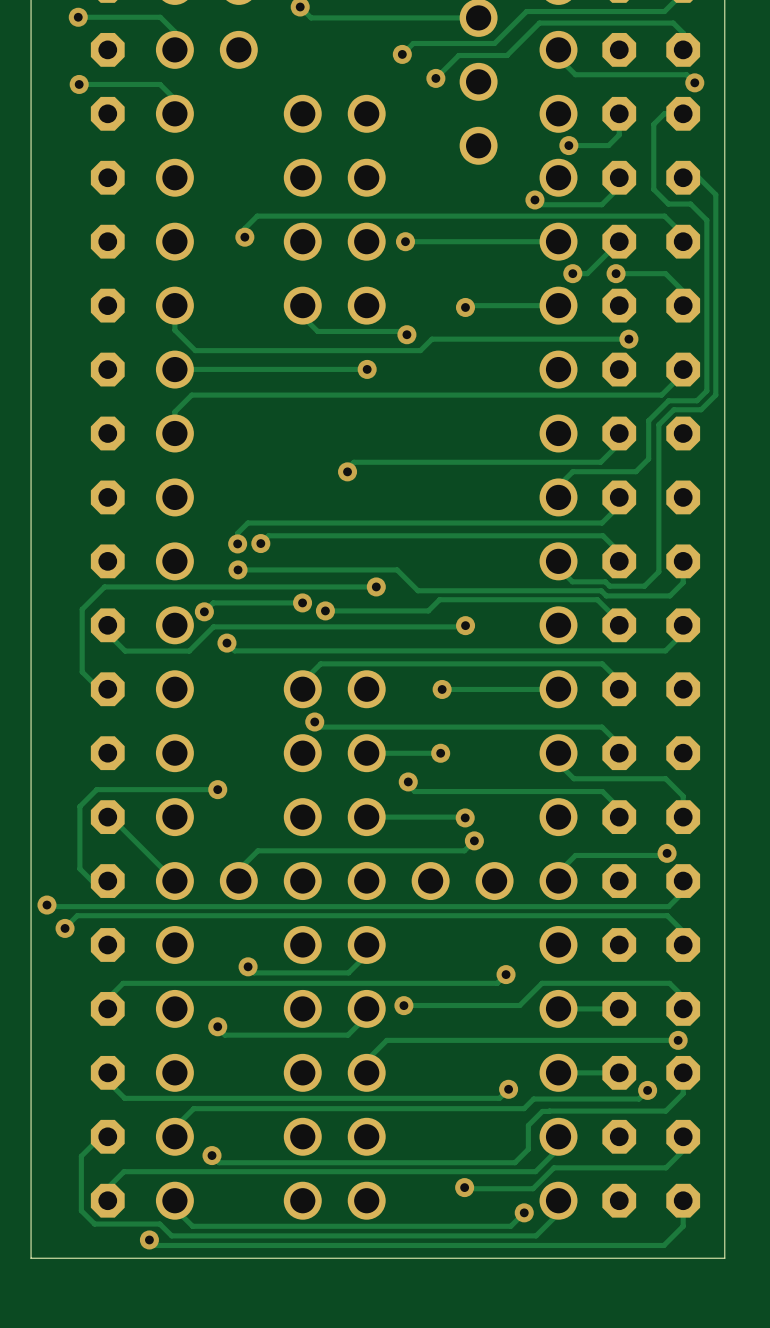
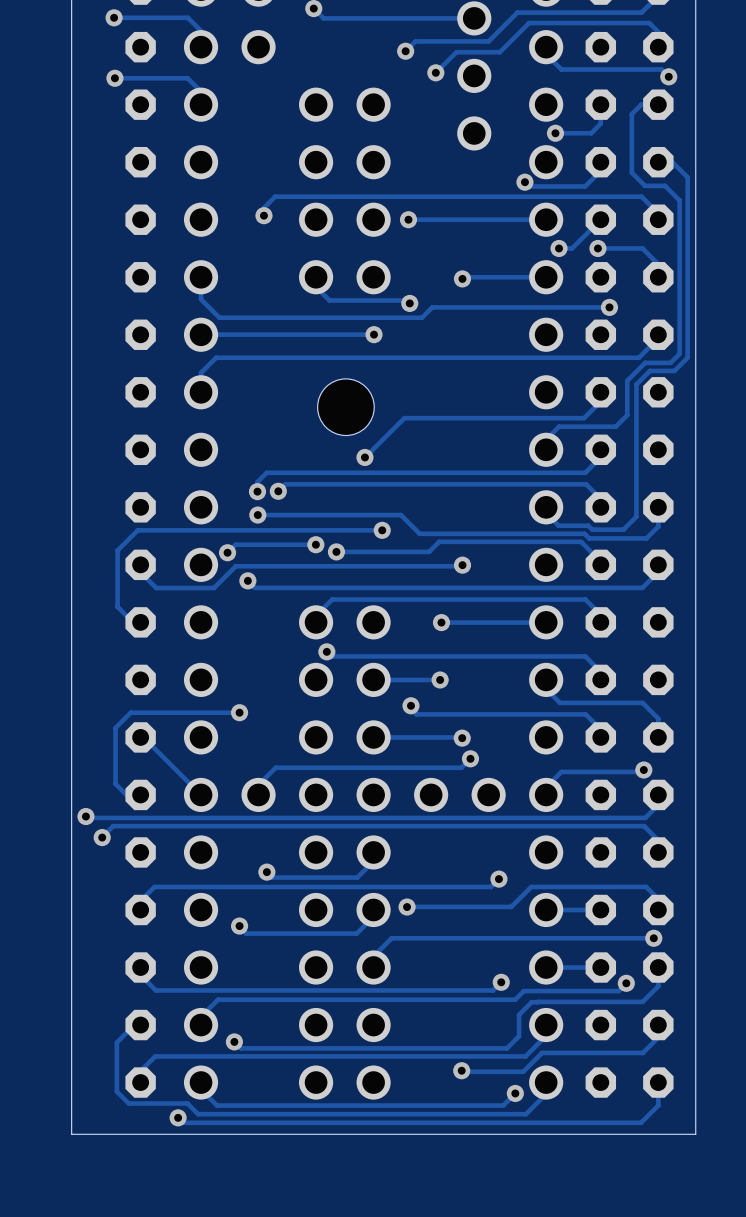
hole: none -> (345, 407)
track: (401, 462) (353, 462) (347, 468) (347, 471) -> (404, 418) (365, 457)
via position: (347, 471) -> (364, 457)

